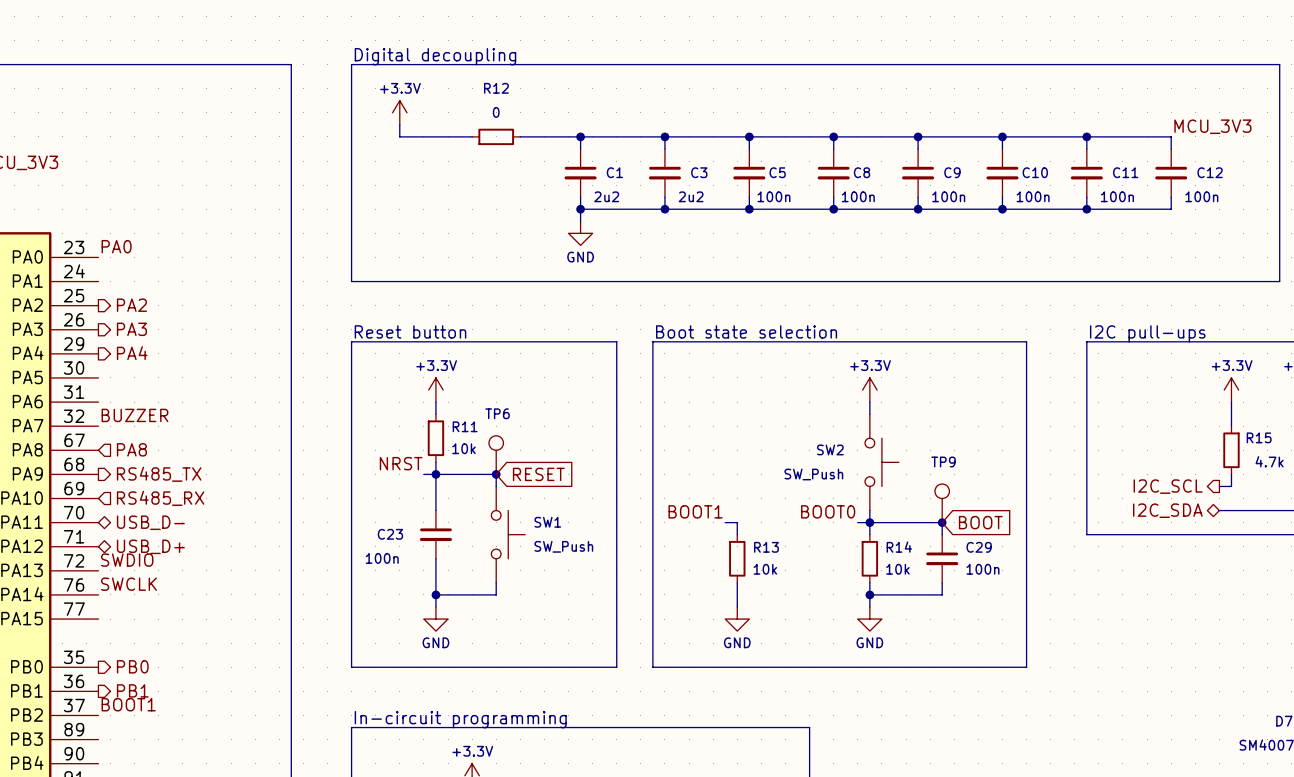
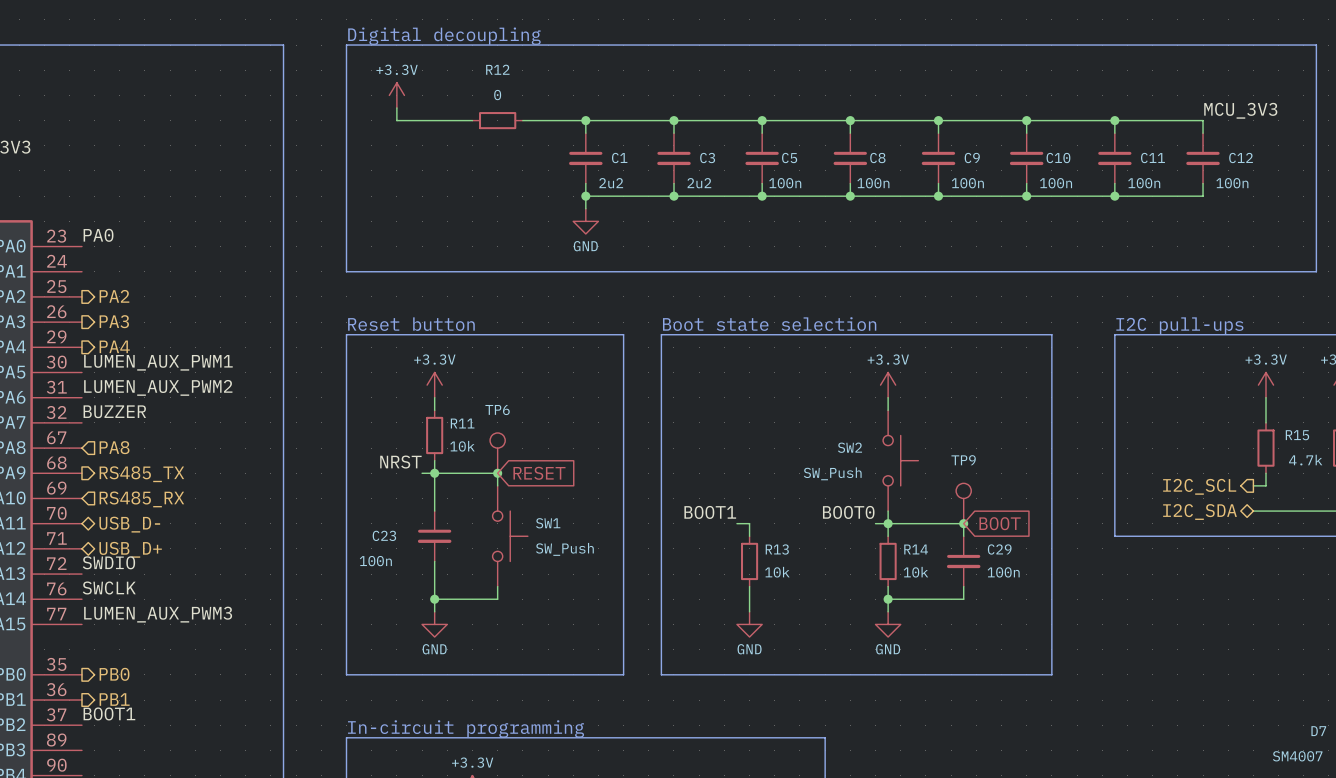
label: none -> LUMEN_AUX_PWM1 (158, 362)
label: none -> LUMEN_AUX_PWM2 (158, 387)
label: none -> LUMEN_AUX_PWM3 (158, 614)

